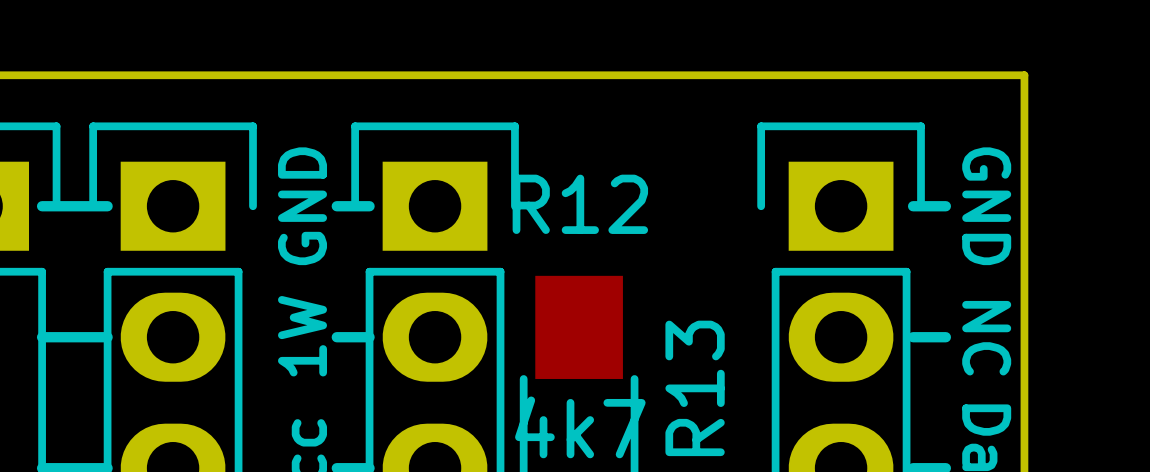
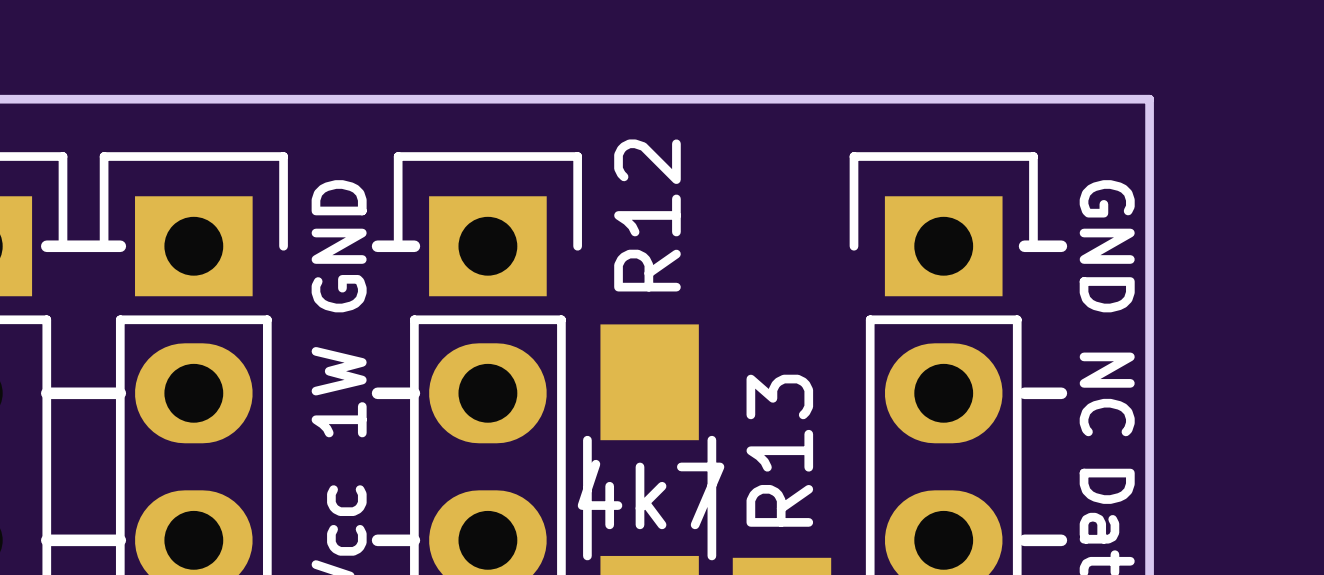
R12 name rotation: 0° (580, 204) -> 90° counterclockwise (647, 215)

